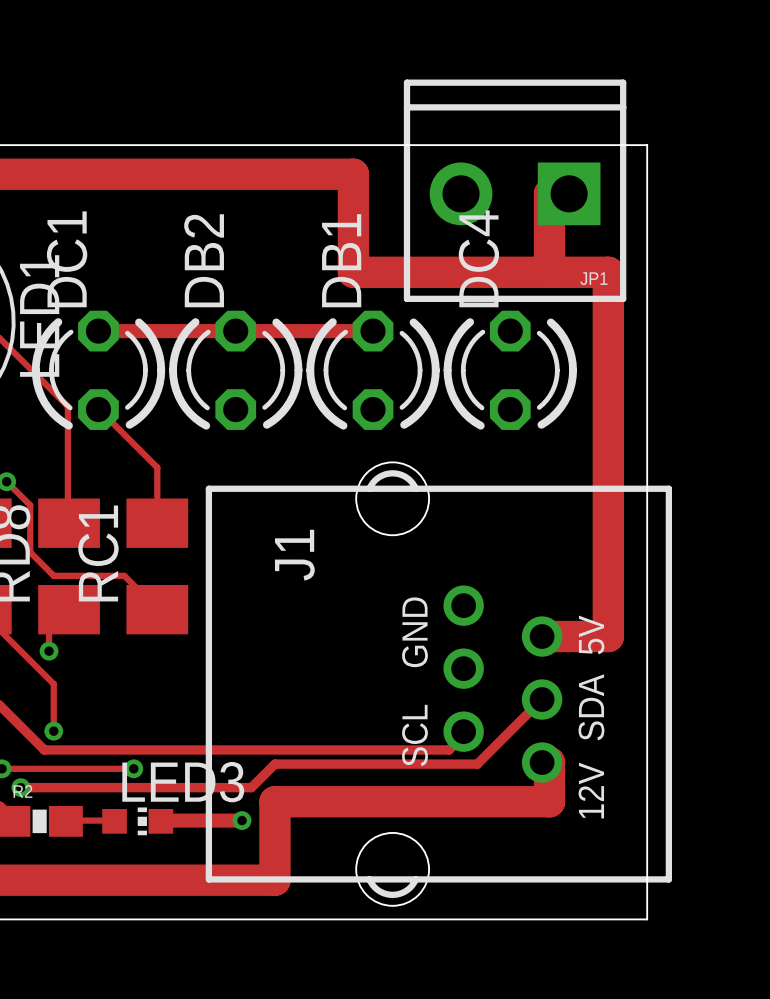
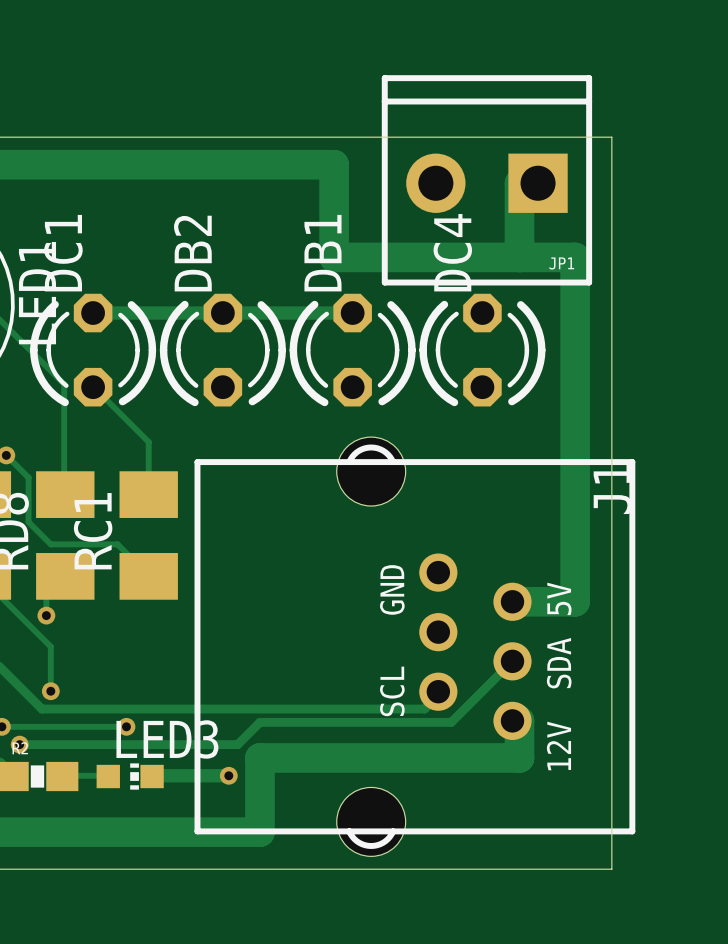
J1 name position: J1 (294, 555) -> J1 (612, 489)

